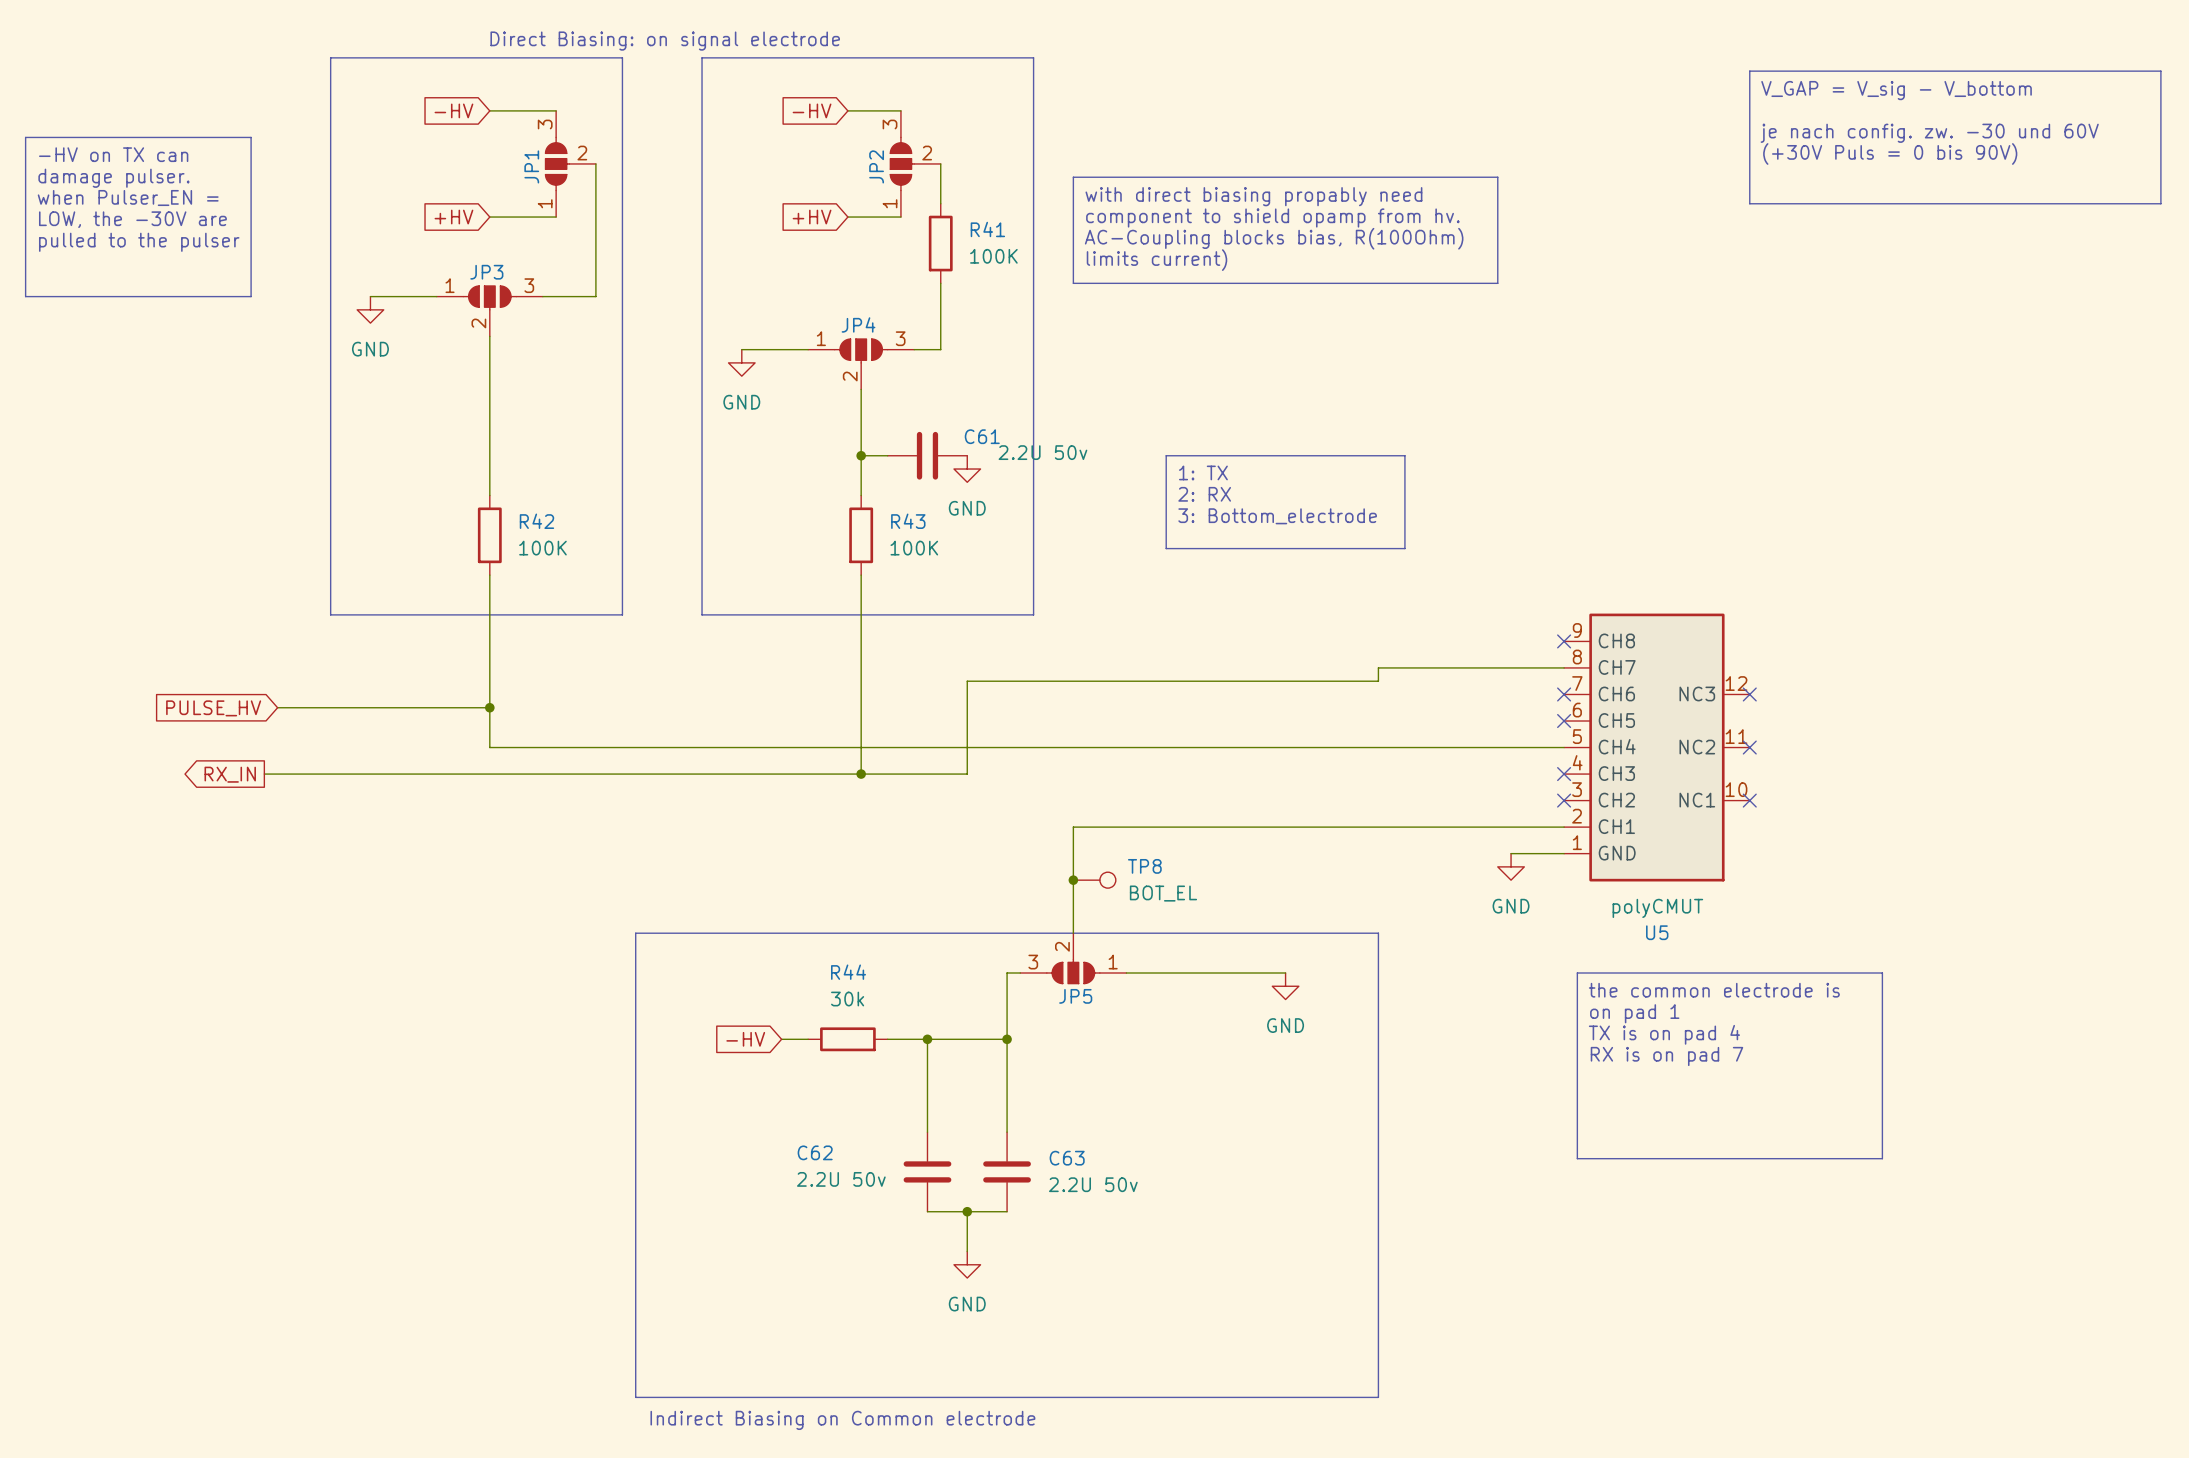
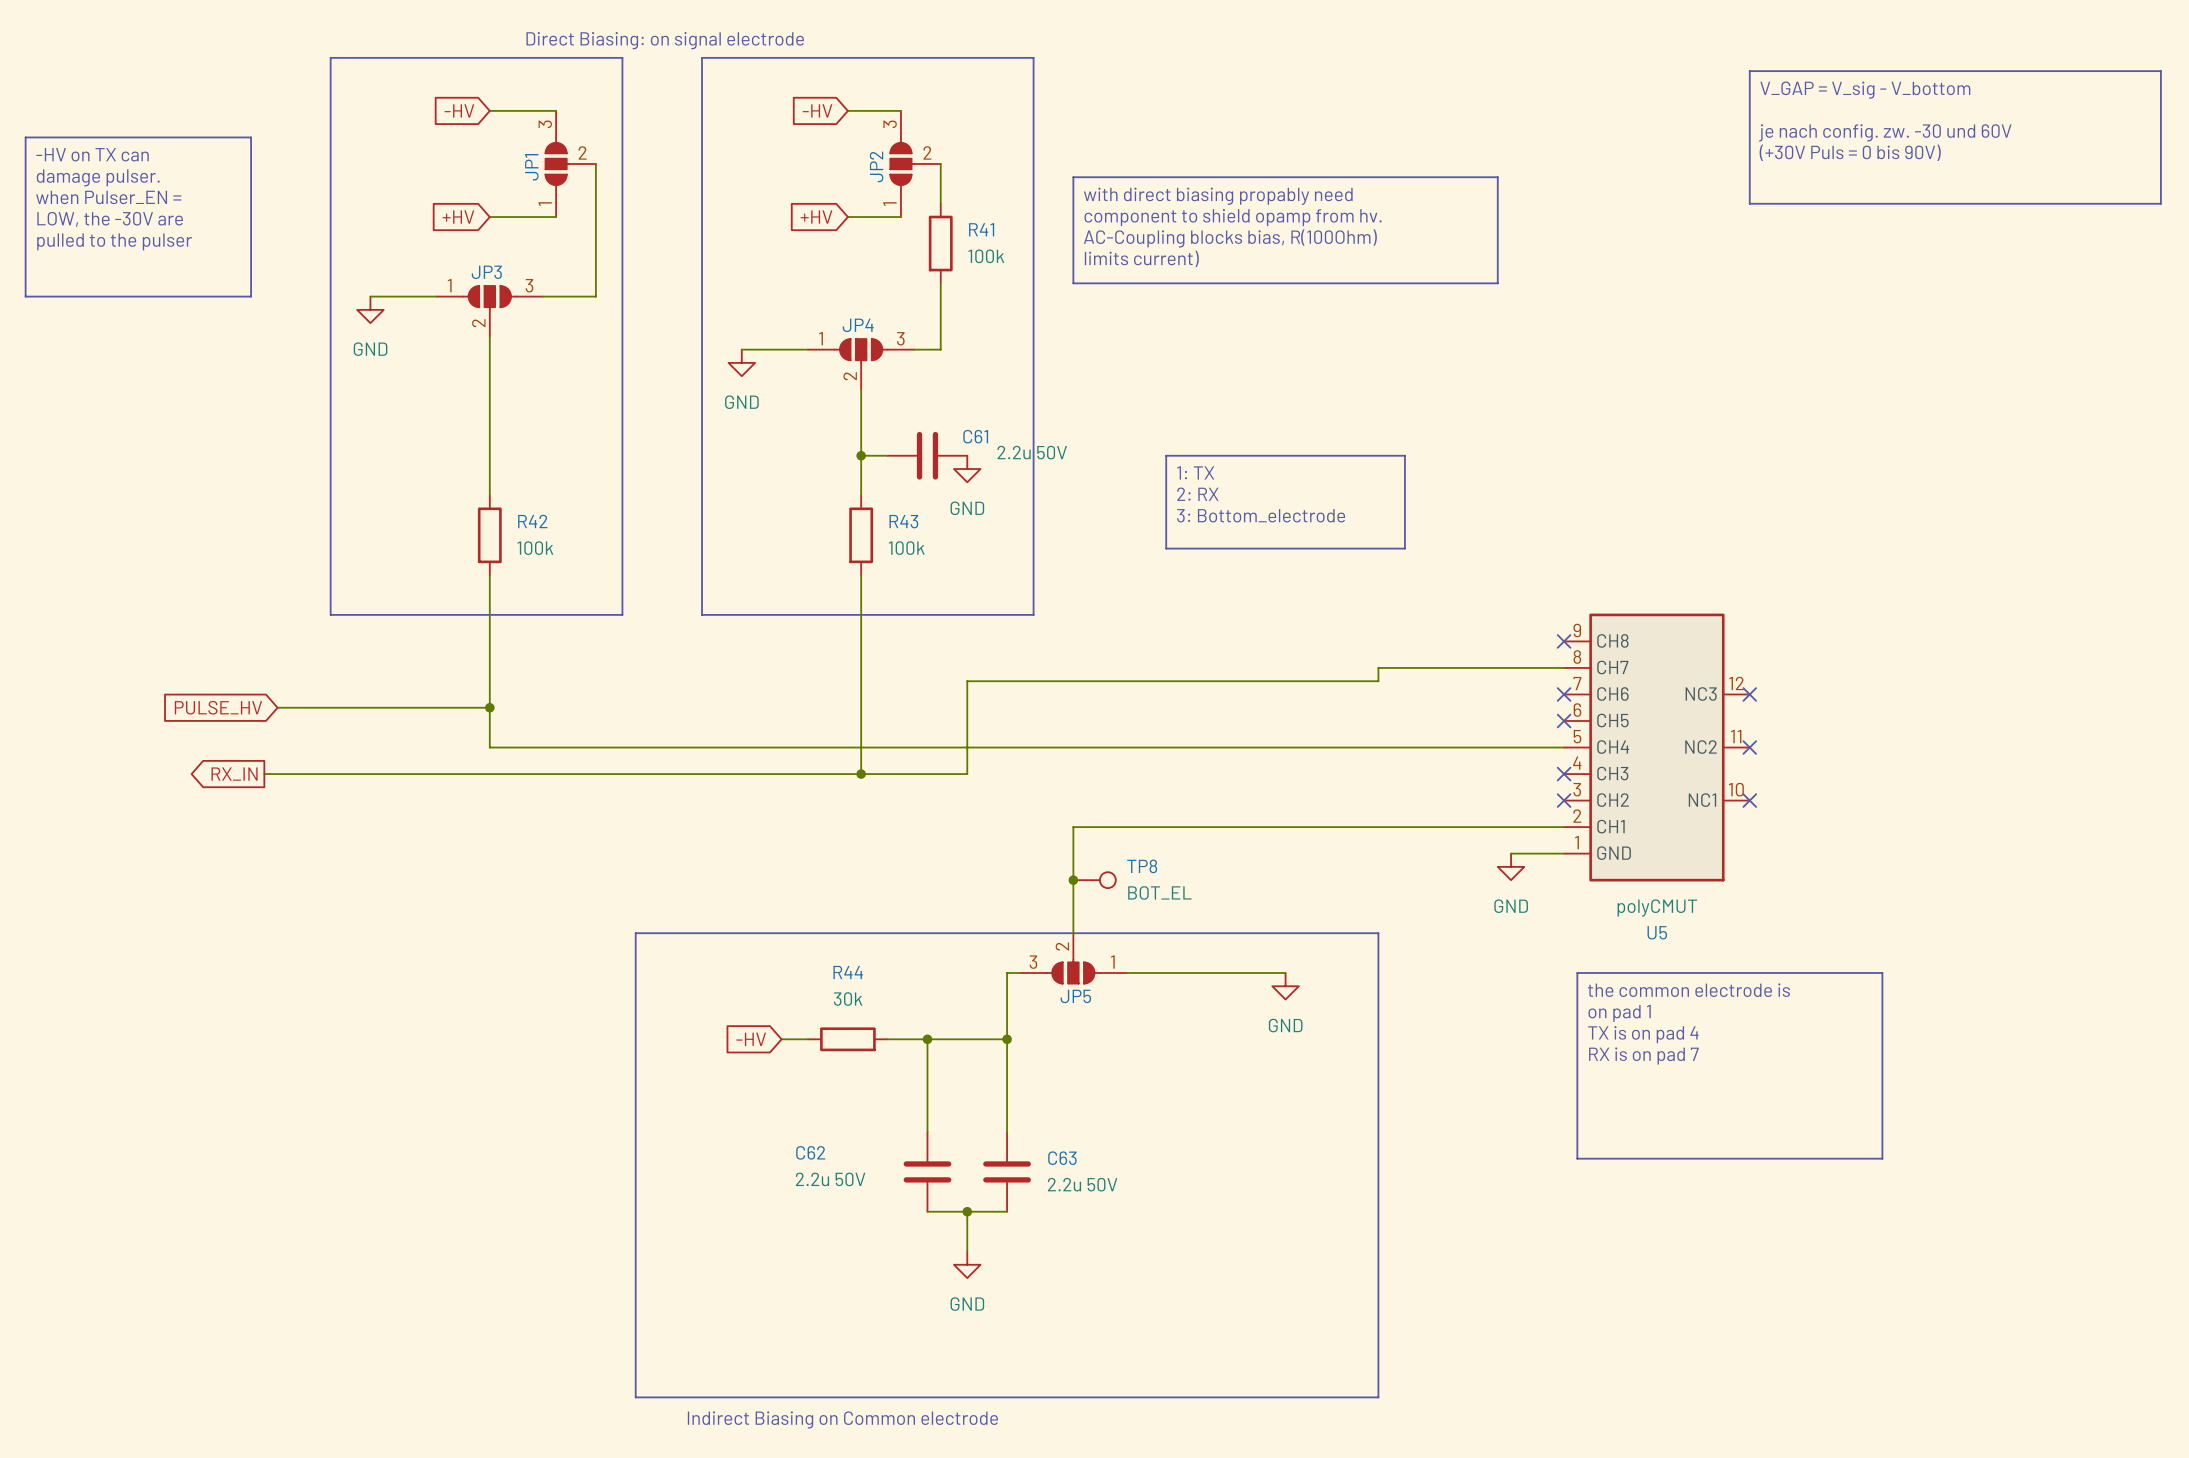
R41 value: 100K (993, 256) -> 100k (986, 256)
C61 value: 2.2U 50v (1042, 452) -> 2.2u 50V (1032, 452)
R42 value: 100K (542, 548) -> 100k (535, 548)
R43 value: 100K (914, 548) -> 100k (906, 548)
C62 value: 2.2U 50v (841, 1179) -> 2.2u 50V (830, 1179)
C63 value: 2.2U 50v (1093, 1184) -> 2.2u 50V (1082, 1184)

